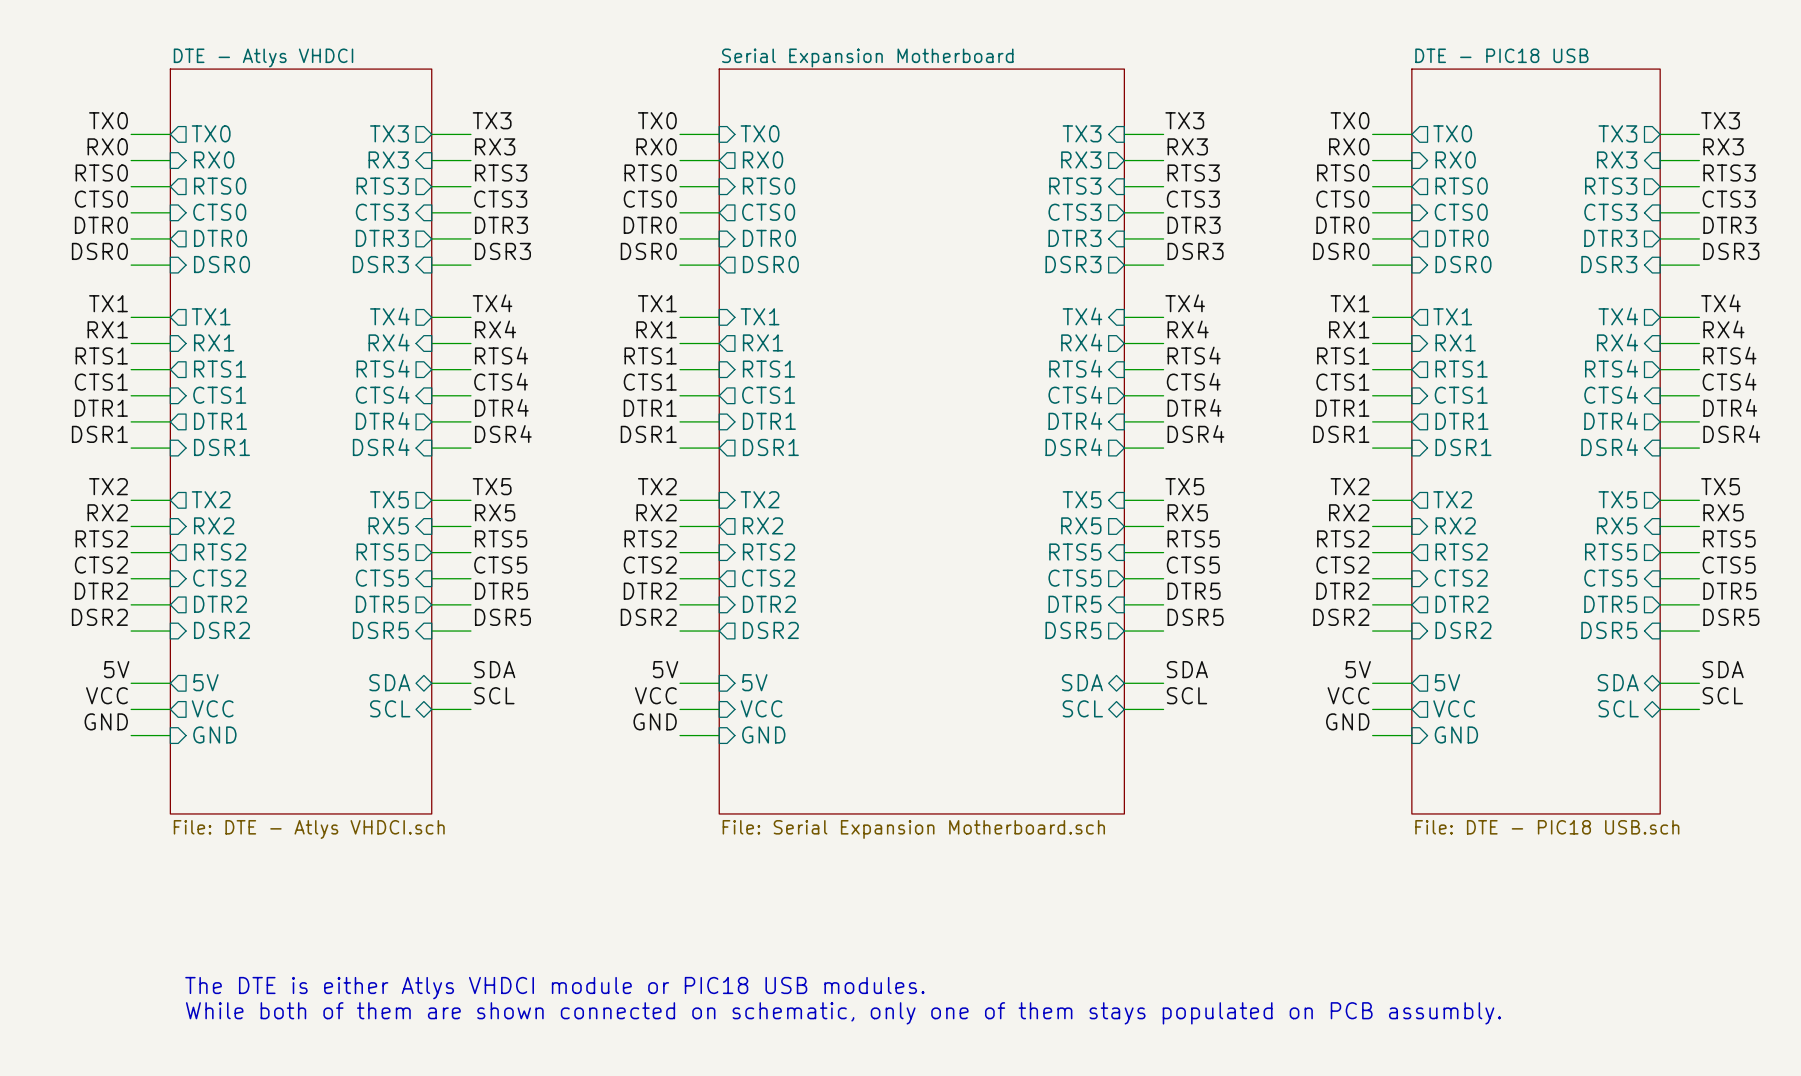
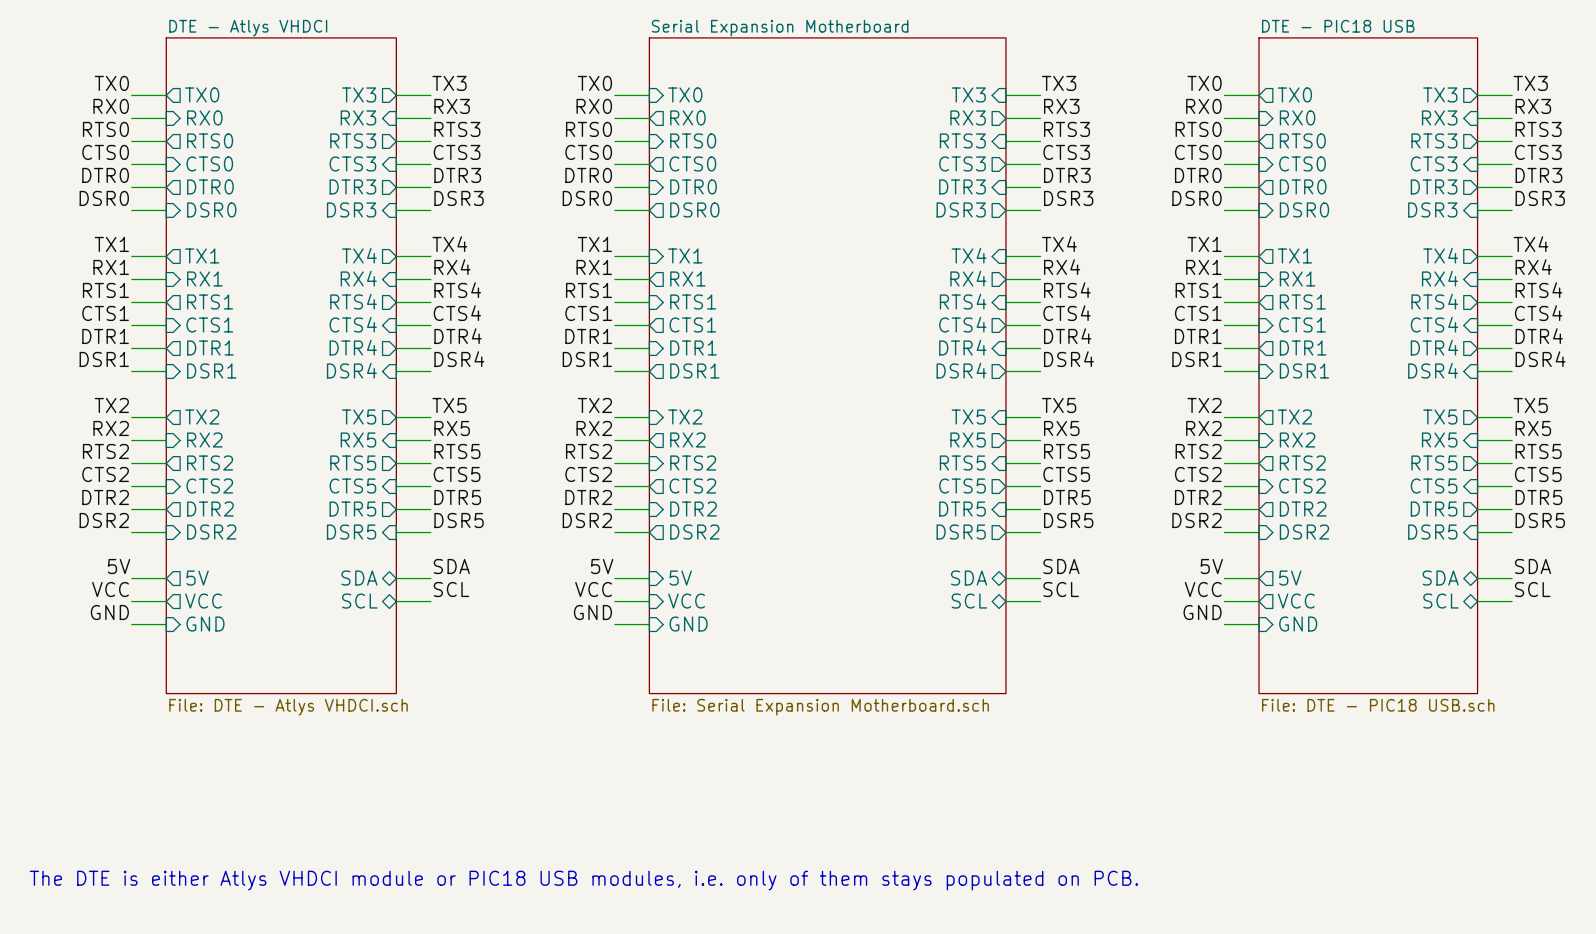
text: The DTE is either Atlys VHDCI module or PIC18 USB modules. (554, 988) -> none
text: While both of them are shown connected on schematic, only one of them stays populated on PCB assumbly. (843, 1013) -> none
text: none -> The DTE is either Atlys VHDCI module or PIC18 USB modules, i.e. only of them stays populated on PCB. (583, 880)

